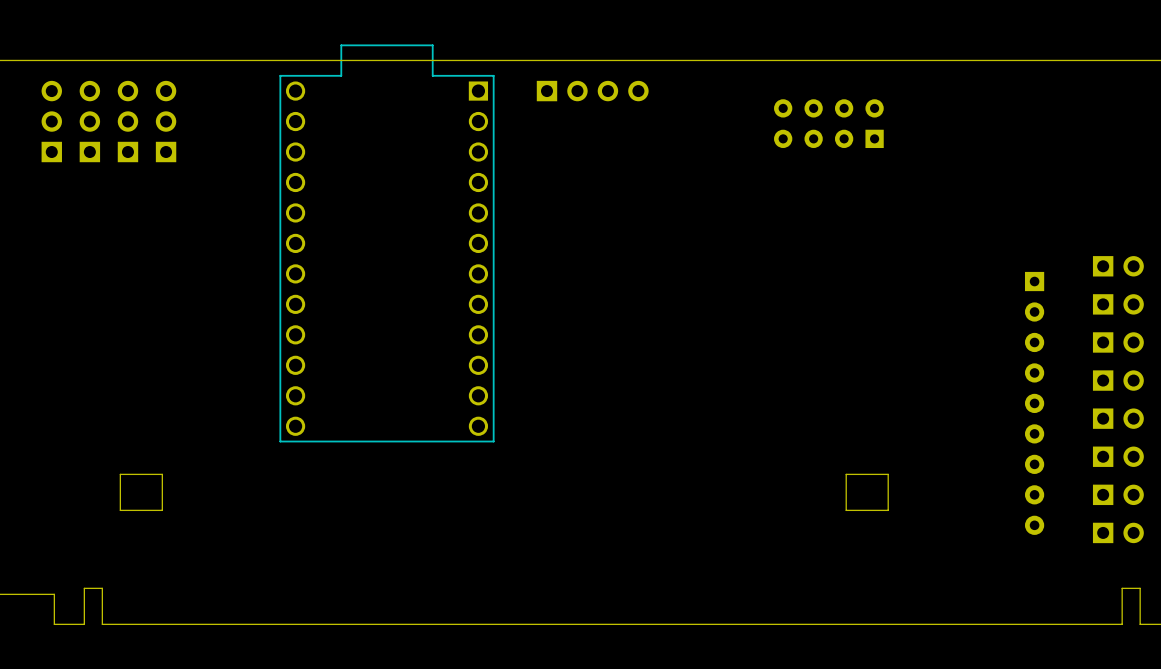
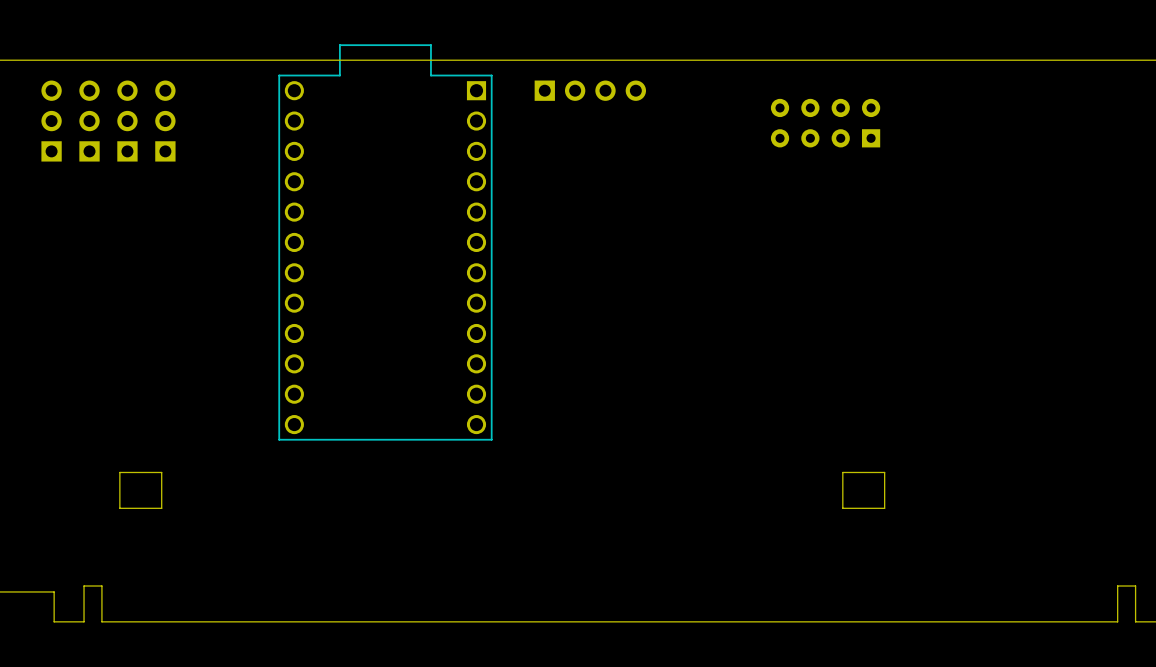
part: (1118, 266) -> none
part: (1118, 304) -> none
part: (1118, 342) -> none
part: (1118, 380) -> none
part: (1034, 403) -> none
part: (1118, 418) -> none
part: (1118, 456) -> none
part: (1118, 494) -> none
part: (1118, 532) -> none

